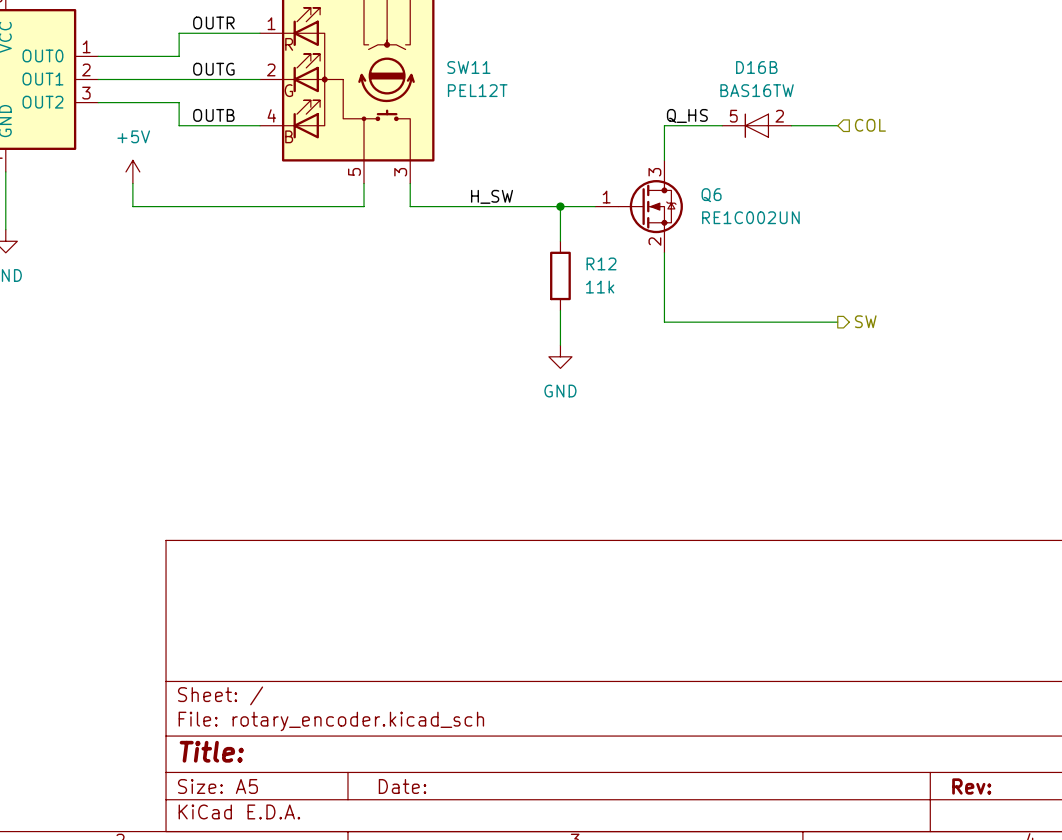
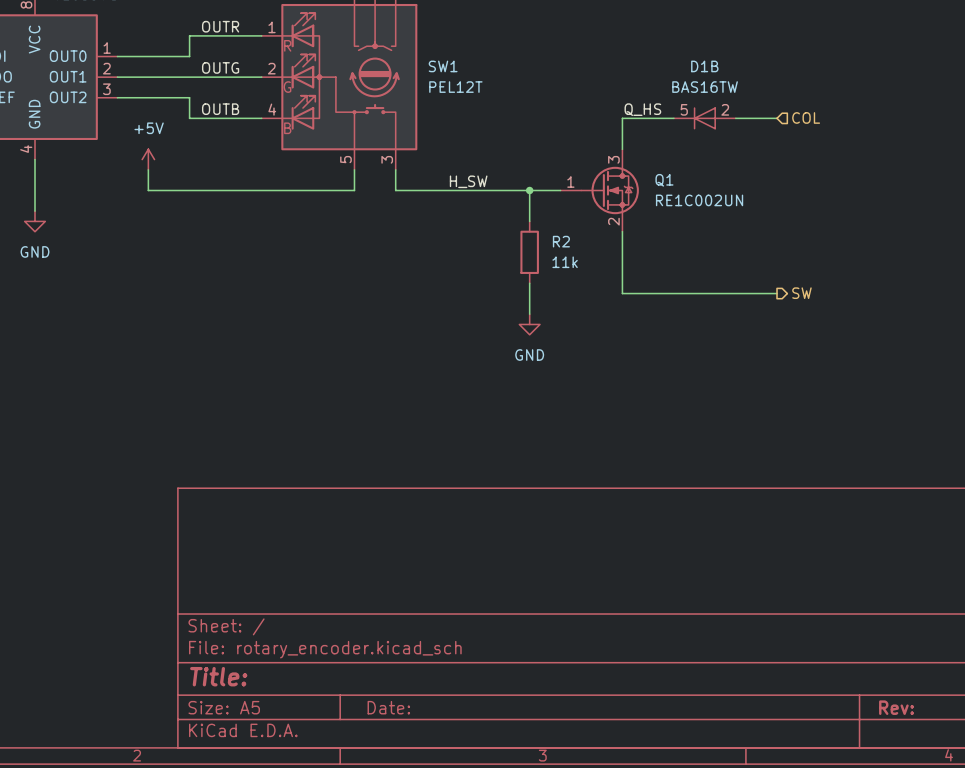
SW11 name: SW11 (468, 67) -> SW1 (443, 66)
D16B name: D16B (756, 67) -> D1B (704, 66)
Q6 name: Q6 (711, 195) -> Q1 (664, 180)
R12 name: R12 (601, 263) -> R2 (561, 241)

